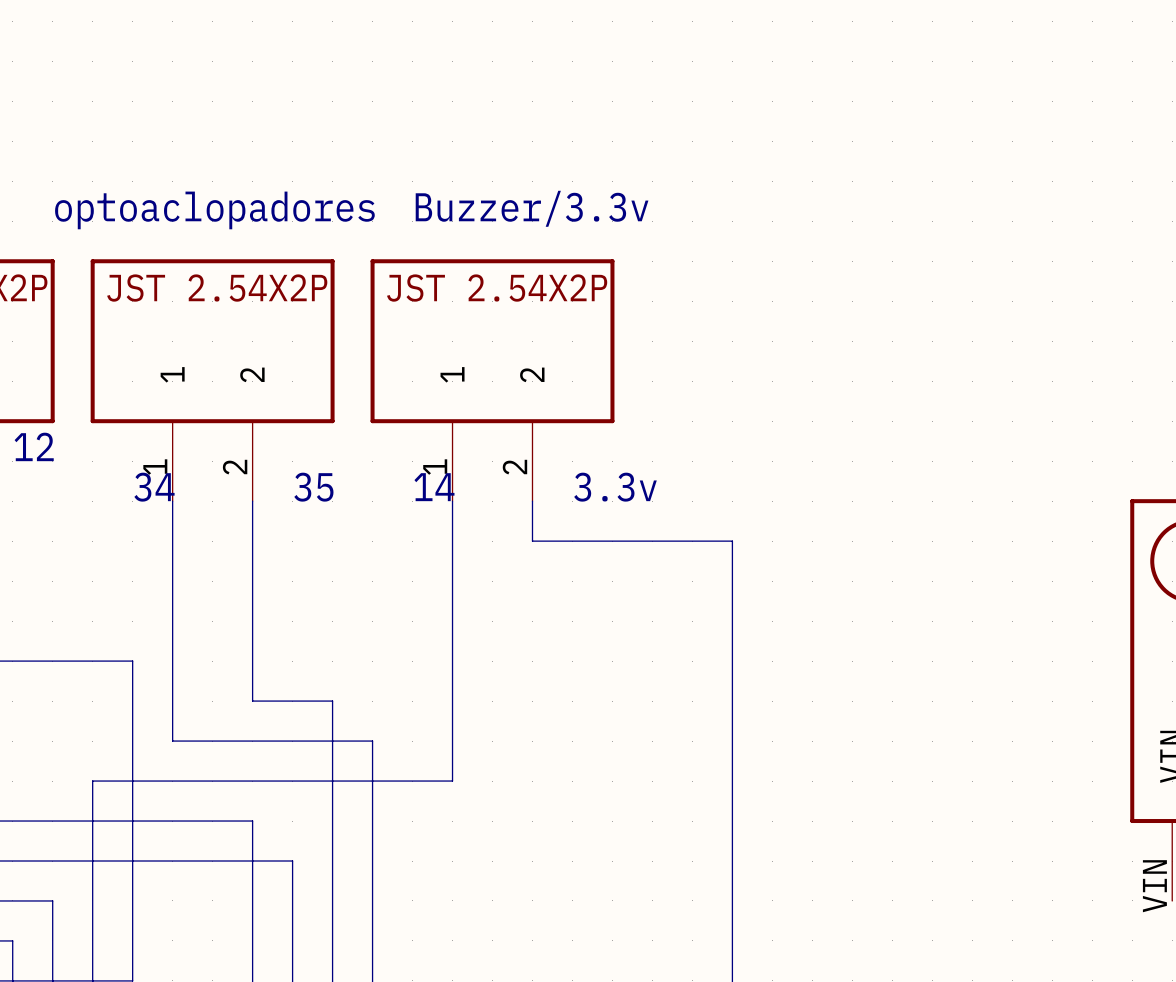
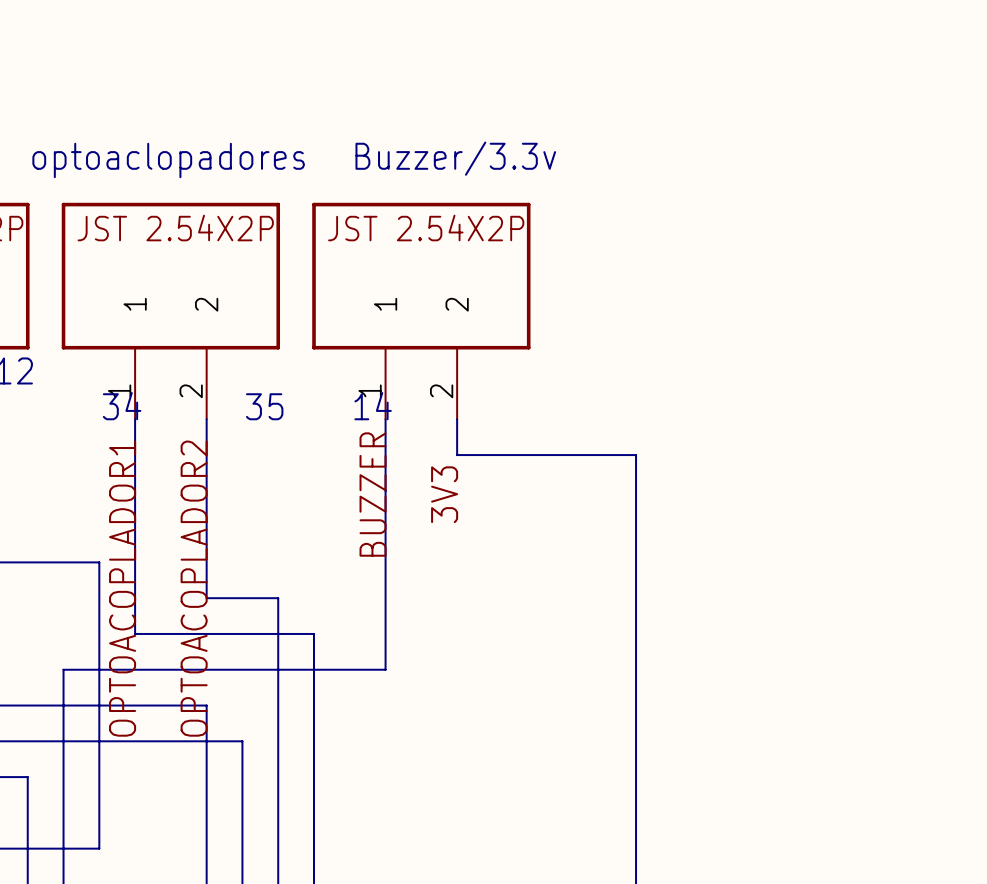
text: 3.3v (615, 487) -> none
label: none -> 3V3 (444, 494)
label: none -> BUZZER (373, 494)
label: none -> OPTOACOPLADOR1 (122, 588)
label: none -> OPTOACOPLADOR2 (194, 588)

